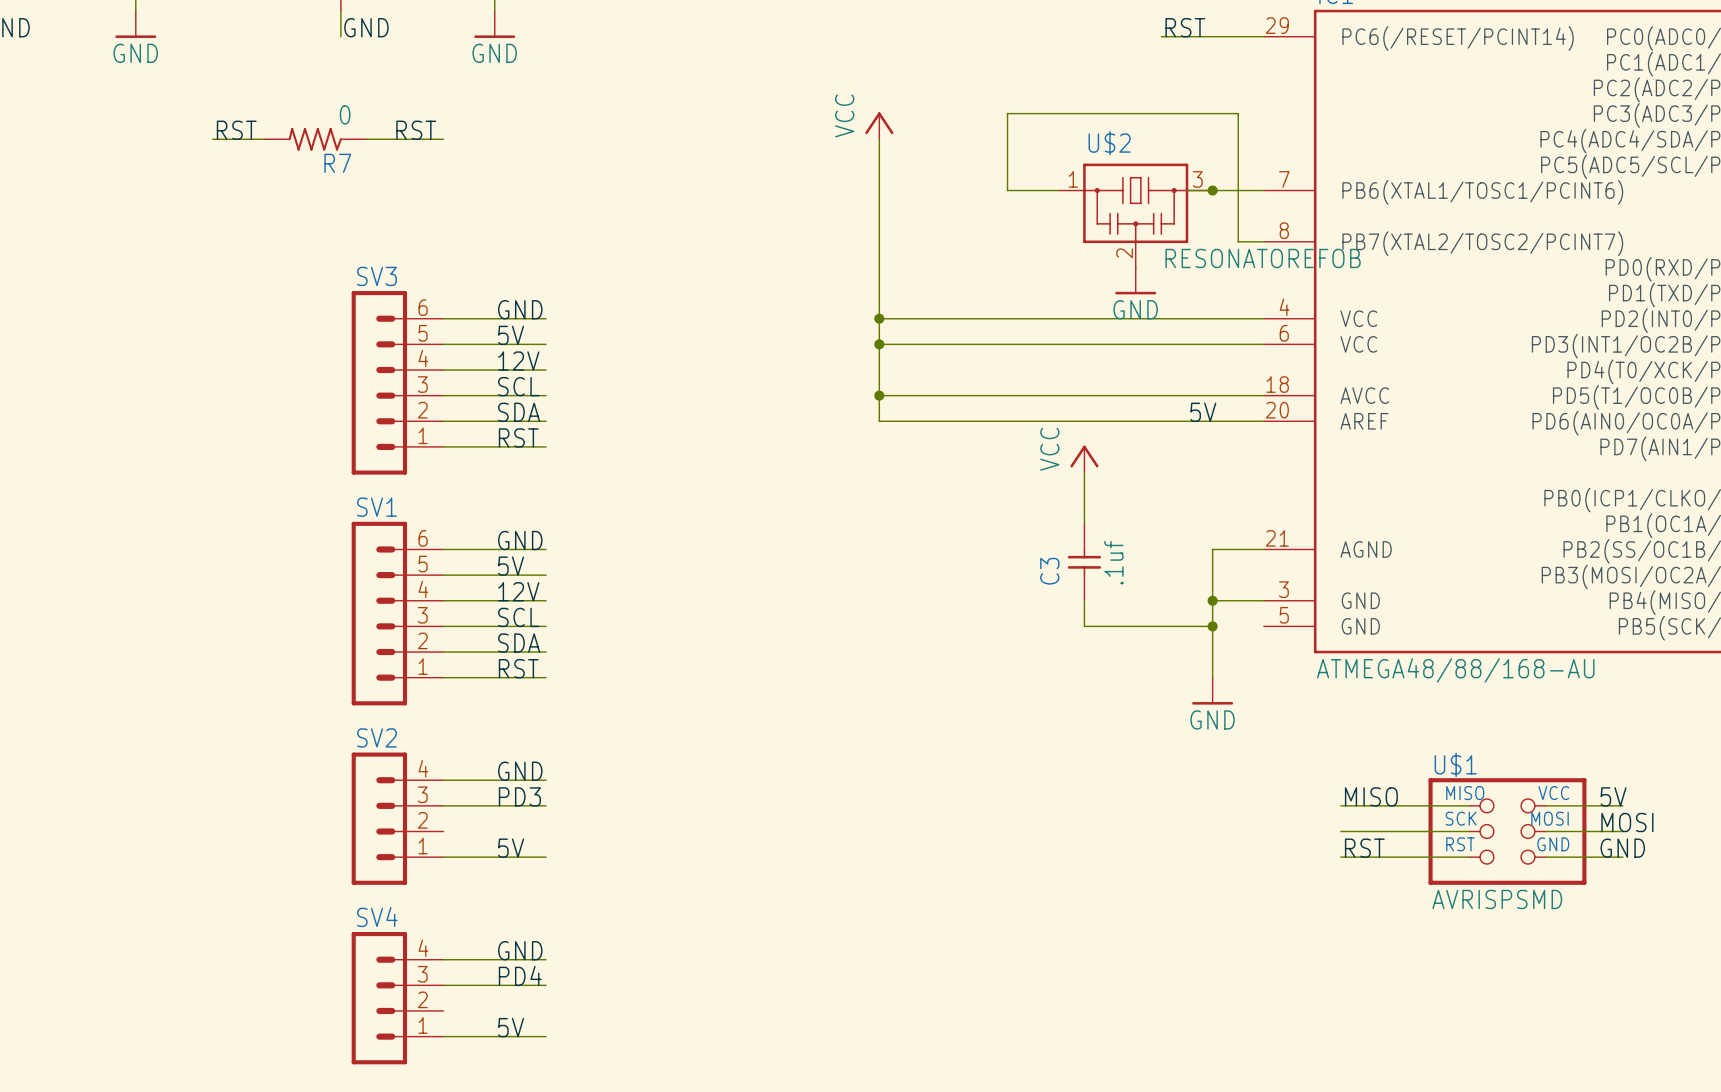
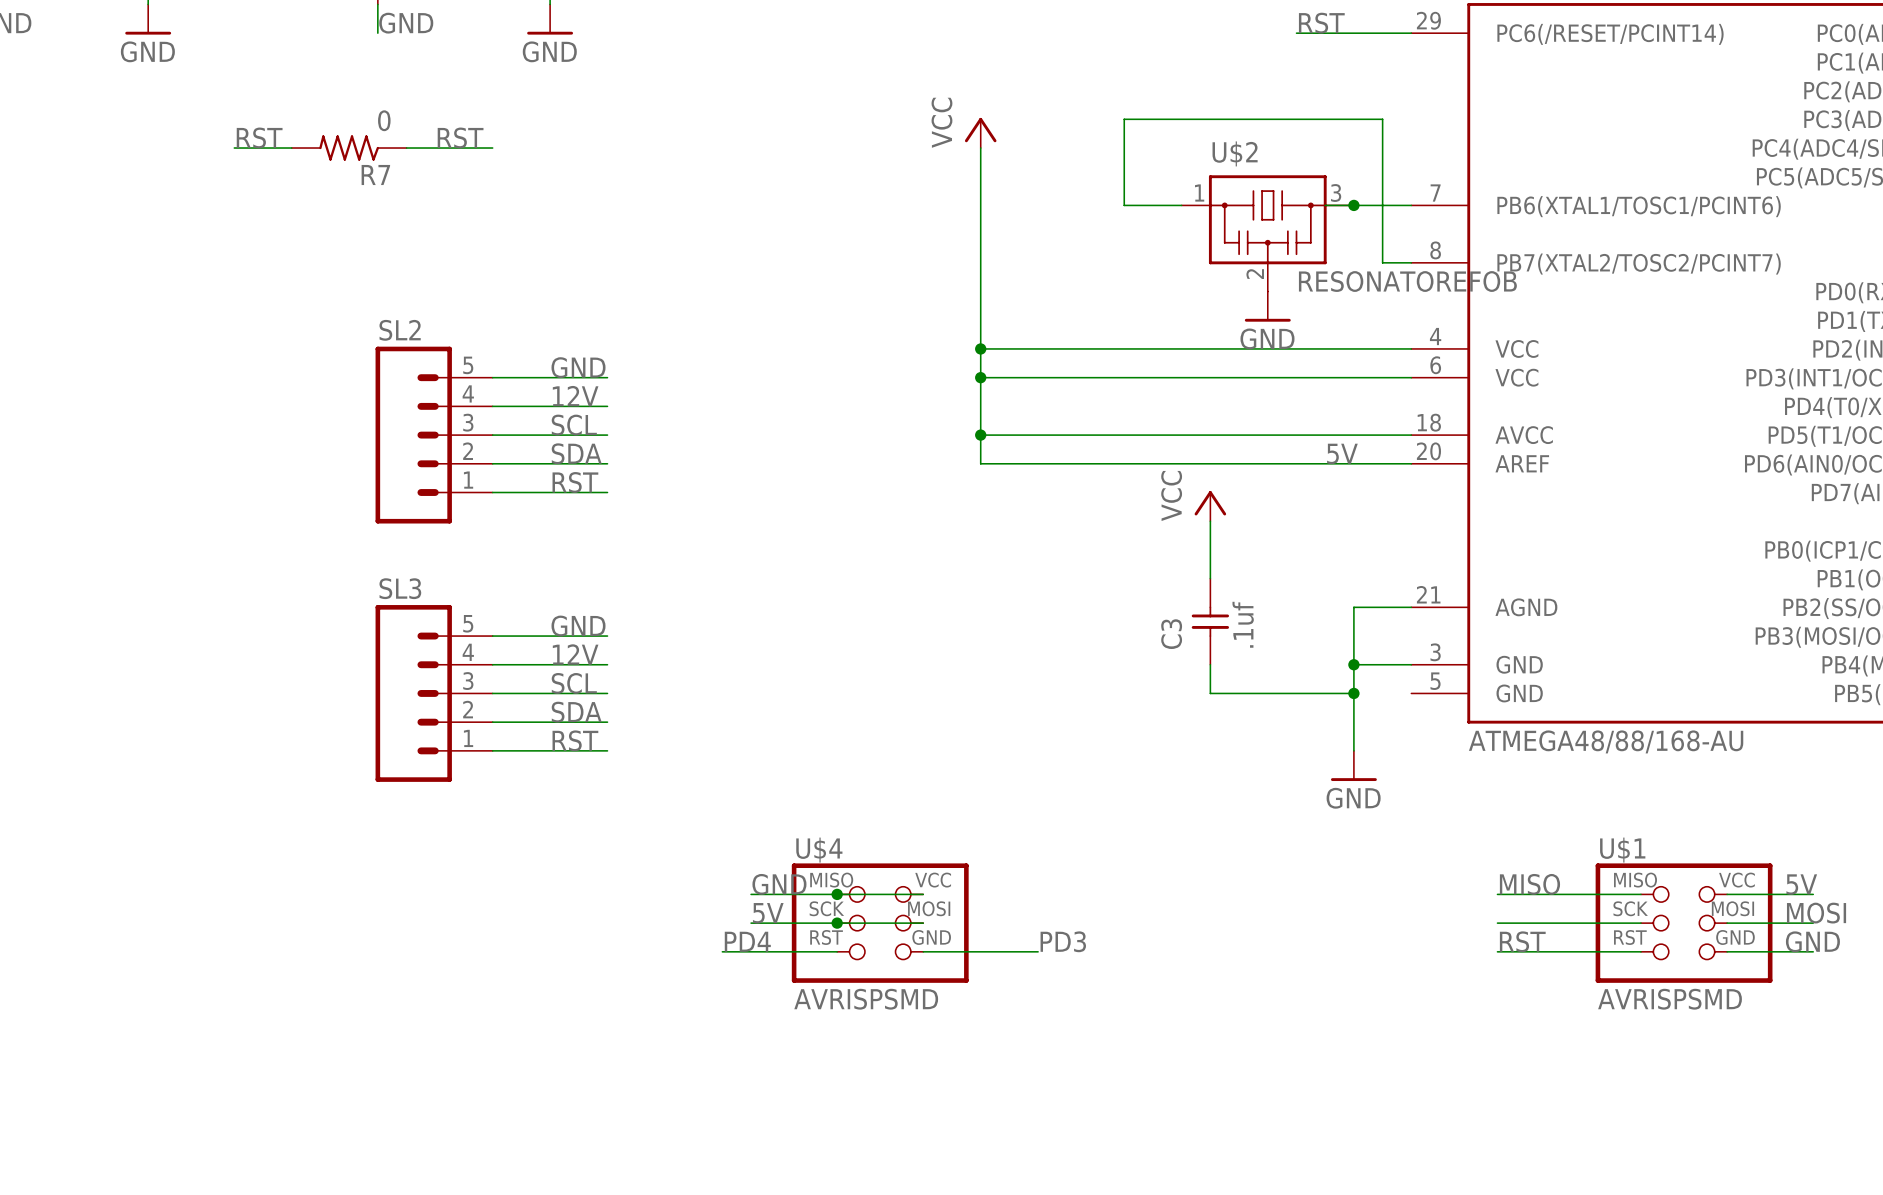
label: GND (520, 309) -> none
wire: (443, 318) (546, 318) -> none
label: 5V (511, 335) -> GND (578, 367)
SV3: (397, 382) -> none
SL2: none -> (434, 435)
label: GND (520, 540) -> none
wire: (443, 549) (546, 549) -> none
label: 5V (511, 566) -> GND (578, 626)
SV1: (397, 613) -> none
SL3: none -> (434, 693)
label: GND (520, 771) -> none
wire: (443, 780) (546, 780) -> none
label: PD3 (519, 796) -> none
label: none -> GND (779, 884)
wire: (443, 805) (546, 805) -> none
wire: none -> (751, 894) (923, 894)
junction: none -> (837, 894)
SV2: (397, 818) -> none
label: none -> 5V (768, 913)
wire: none -> (751, 923) (923, 923)
junction: none -> (837, 923)
U$4: none -> AVRISPSMD (880, 923)
label: 5V (511, 848) -> none
label: none -> PD3 (1063, 941)
wire: (443, 857) (546, 857) -> (722, 951) (837, 951)
wire: none -> (923, 951) (1038, 951)
label: GND (520, 950) -> none
wire: (443, 959) (546, 959) -> none
label position: PD4 (520, 975) -> PD4 (747, 941)
wire: (443, 985) (546, 985) -> none
SV4: (397, 998) -> none
label: 5V (511, 1027) -> none
wire: (443, 1036) (546, 1036) -> none

